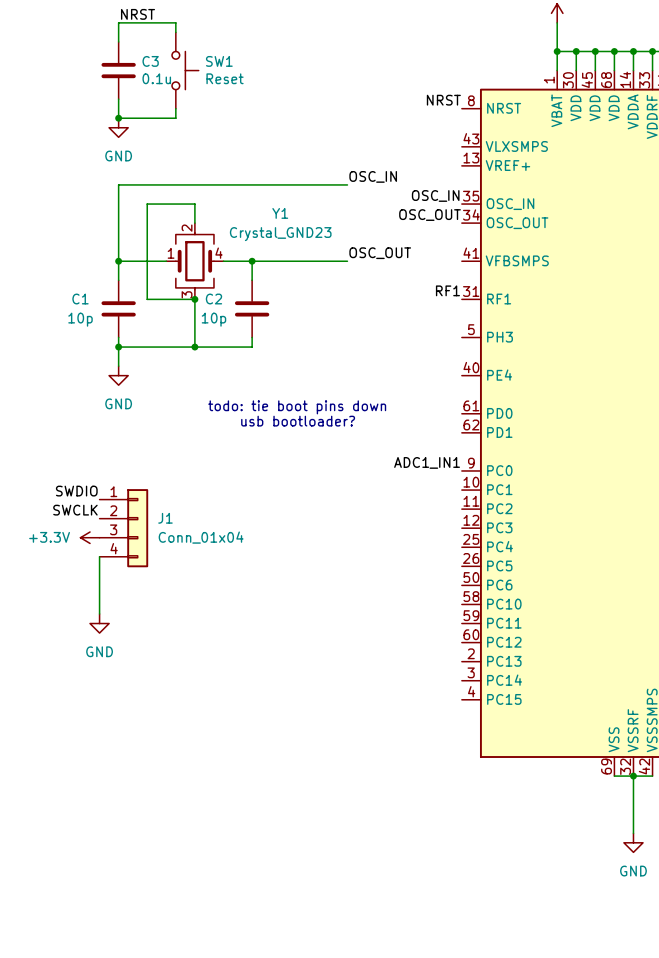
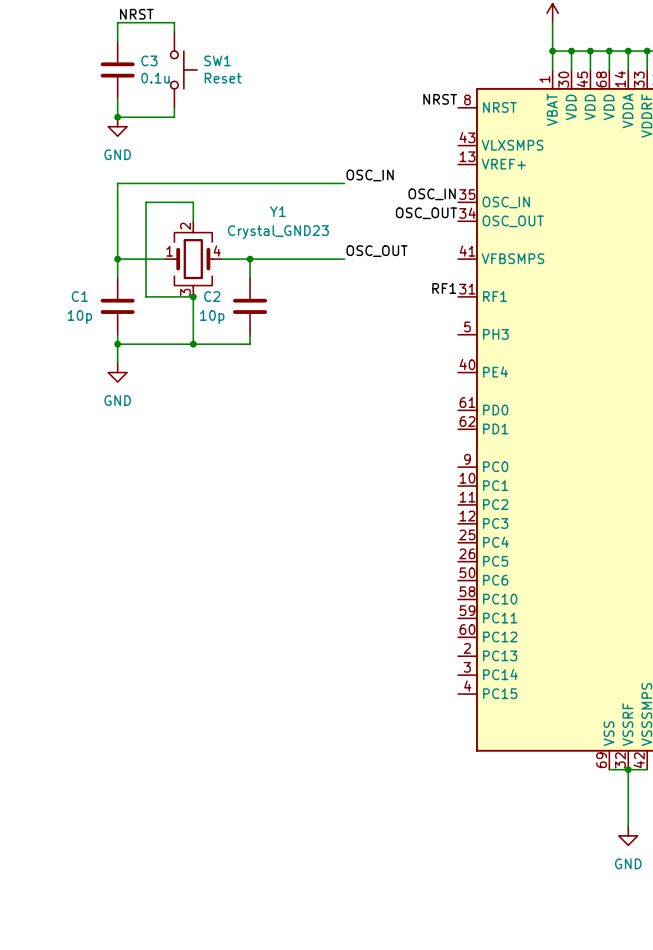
text: todo: tie boot pins down (297, 407) -> none
text: usb bootloader? (298, 421) -> none
label: ADC1_IN1 (427, 462) -> none
label: SWDIO (76, 491) -> none
label: SWCLK (75, 510) -> none
J1: Conn_01x04 (123, 528) -> none
power symbol: +3.3V (90, 537) -> none
wire: (99, 556) (99, 613) -> none
power symbol: GND (99, 623) -> none

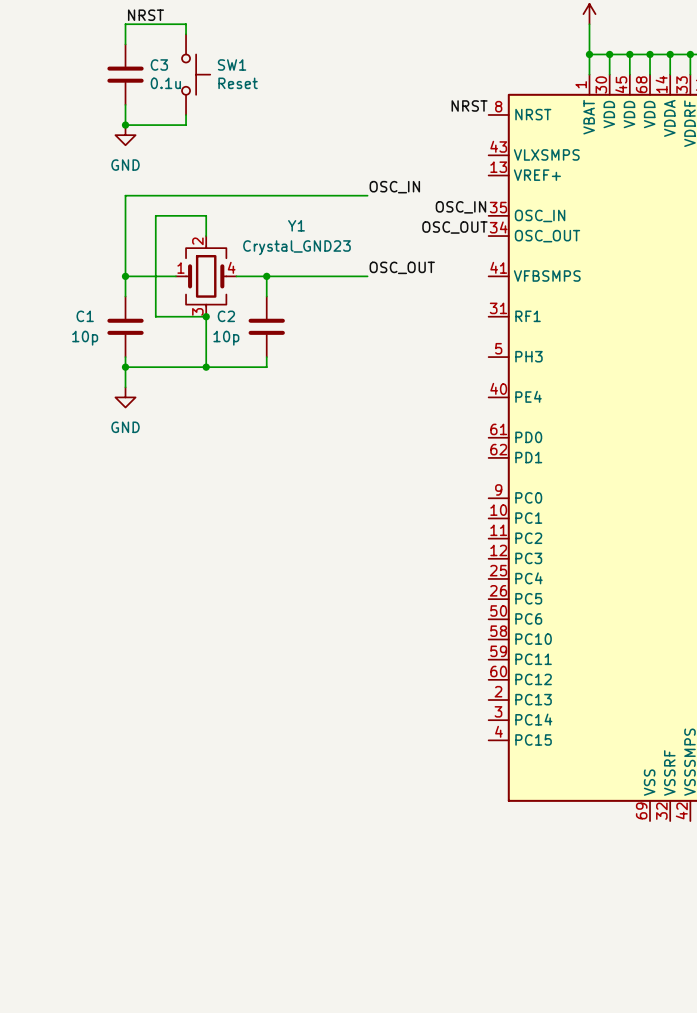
label: RF1 (444, 288) -> none
wire: (609, 769) (647, 769) -> none
wire: (628, 769) (628, 826) -> none
junction: (628, 769) -> none
power symbol: GND (628, 835) -> none

